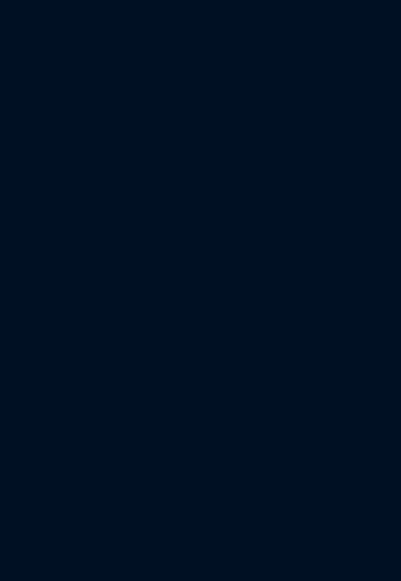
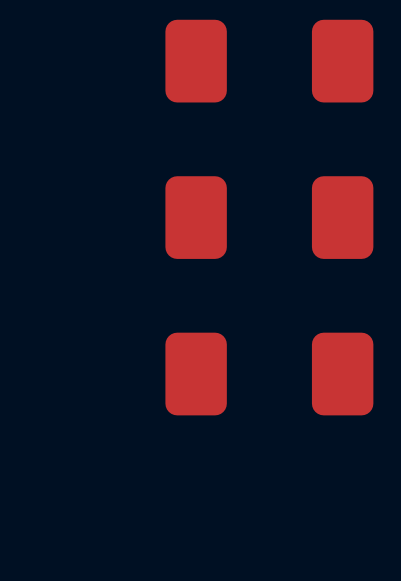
part: none -> (269, 61)
part: none -> (269, 217)
part: none -> (269, 374)

